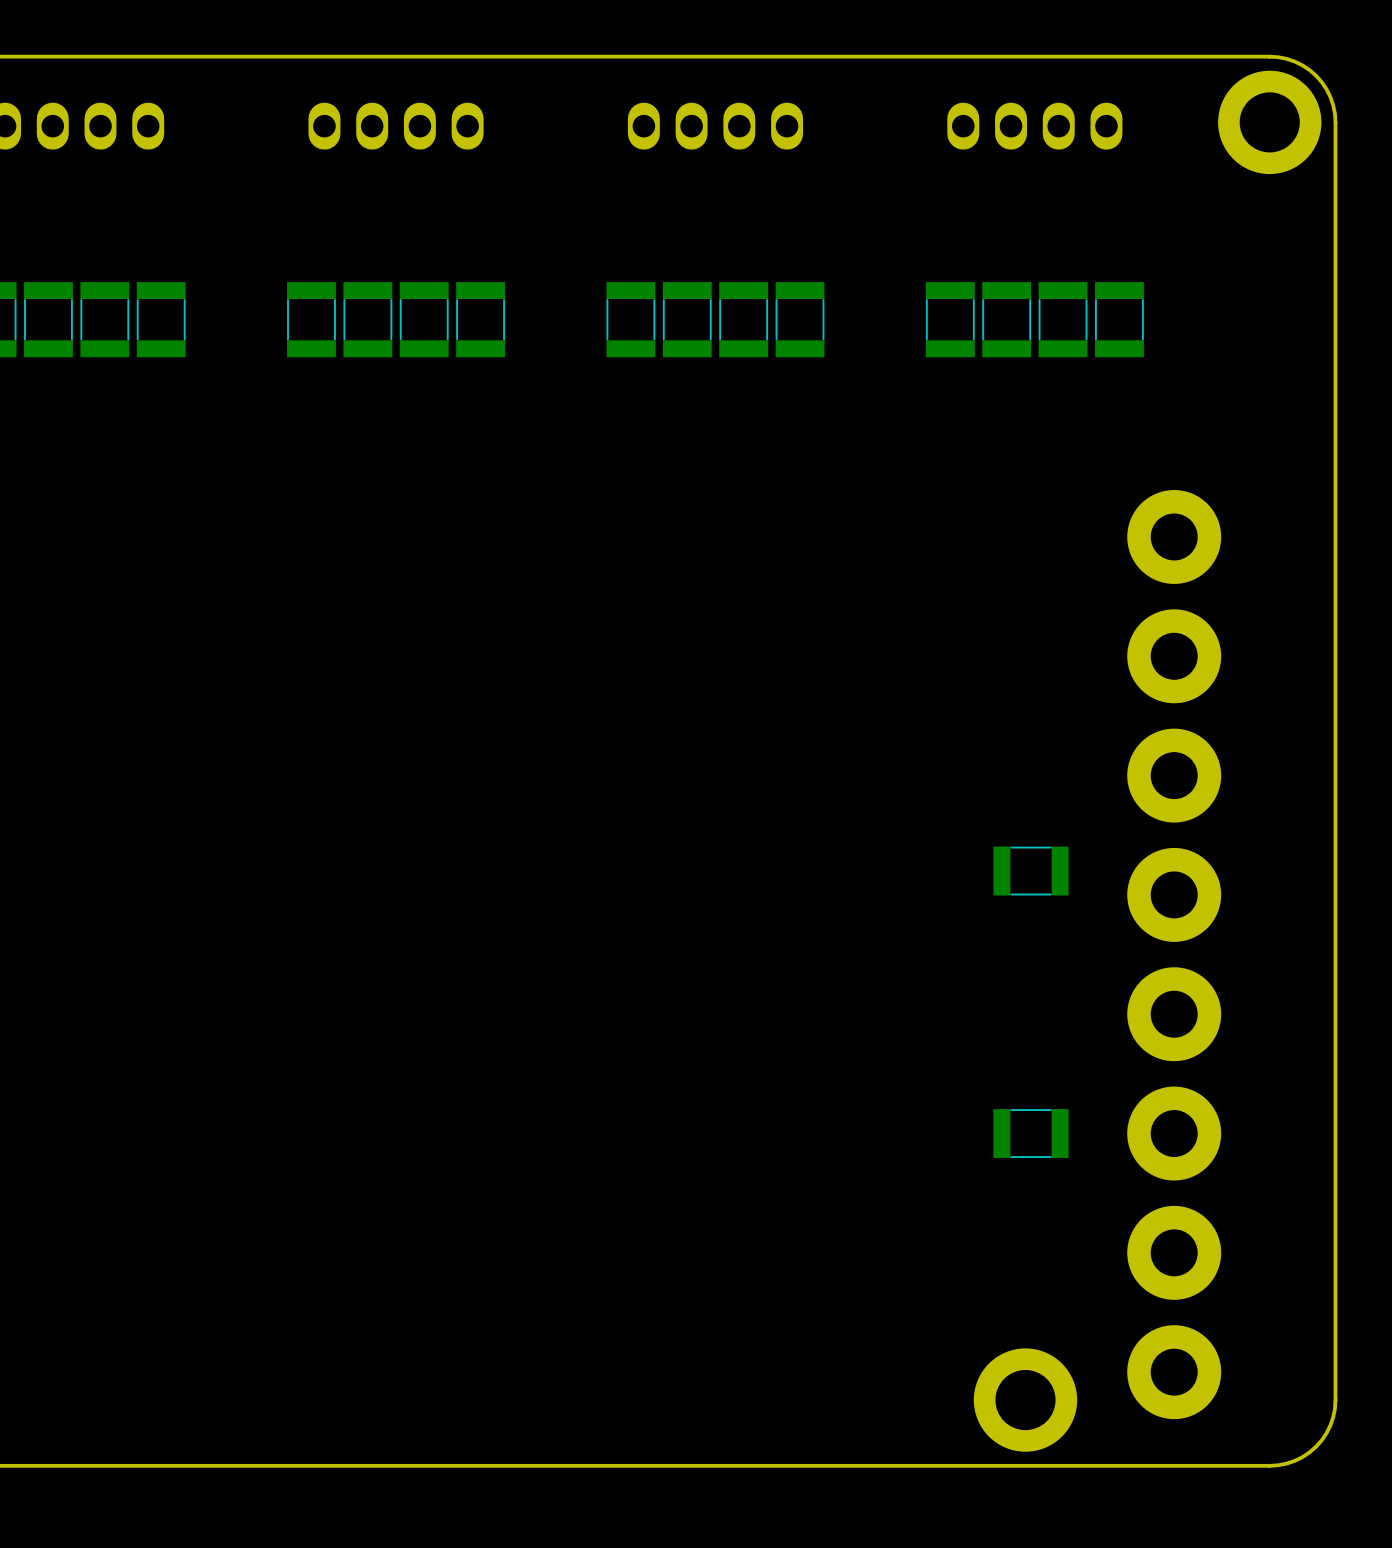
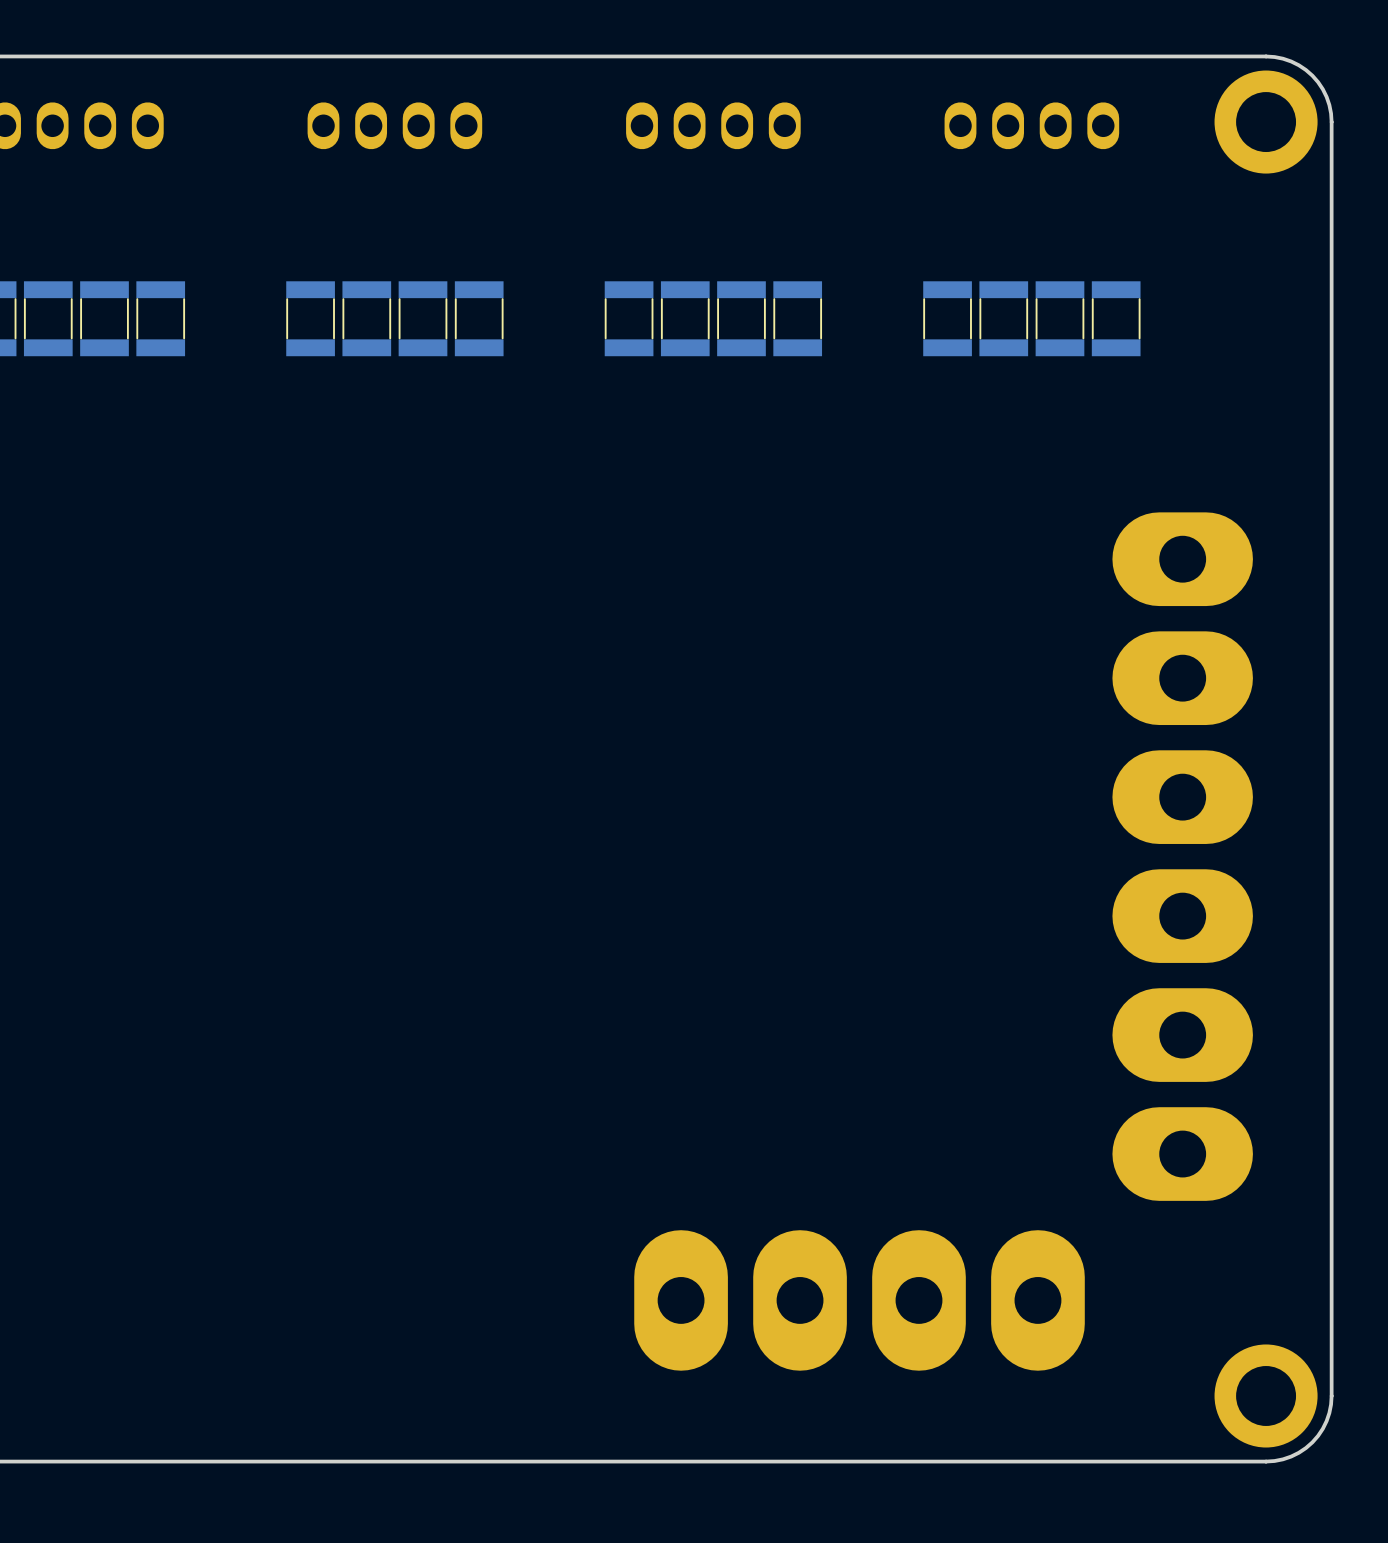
part: (1174, 596) -> none
part: none -> (1182, 618)
part: (1031, 871) -> none
part: (1174, 954) -> none
part: none -> (1182, 975)
part: (1031, 1133) -> none
part: none -> (859, 1300)
part: (1174, 1312) -> none
part position: (1025, 1400) -> (1266, 1395)

